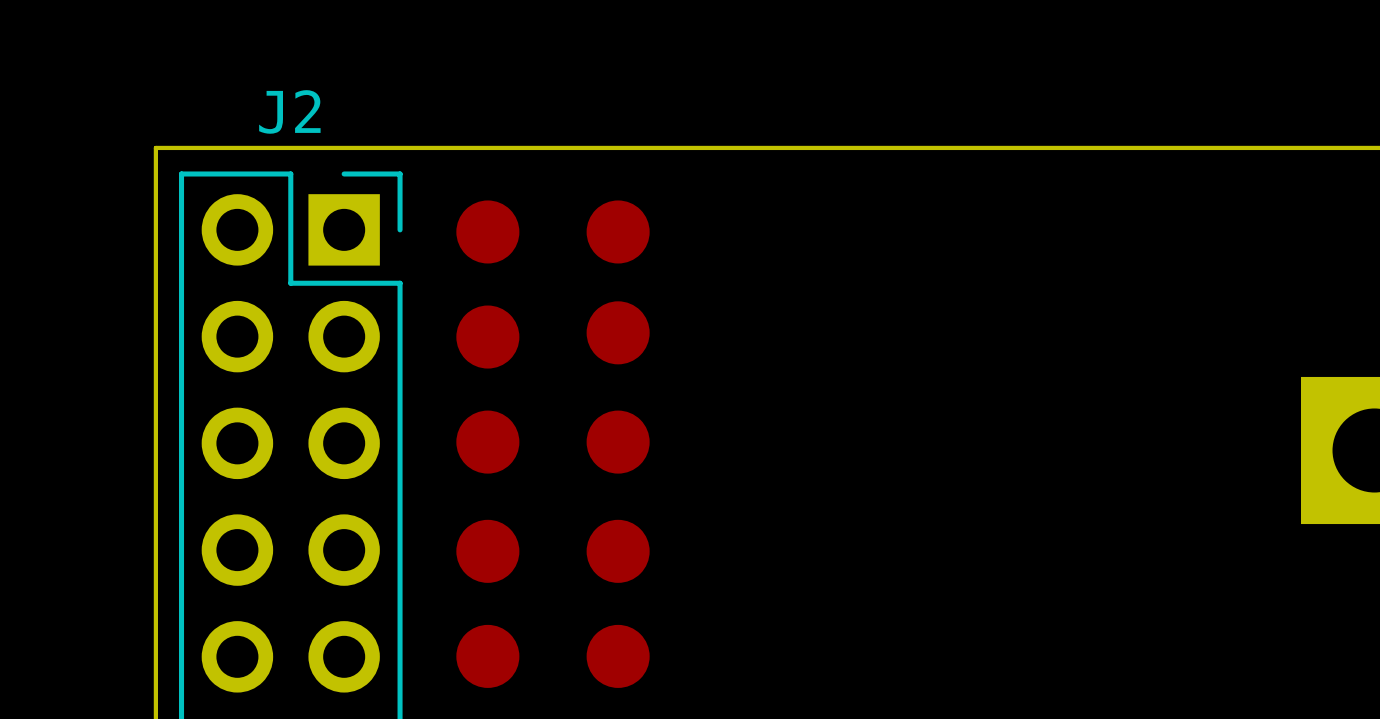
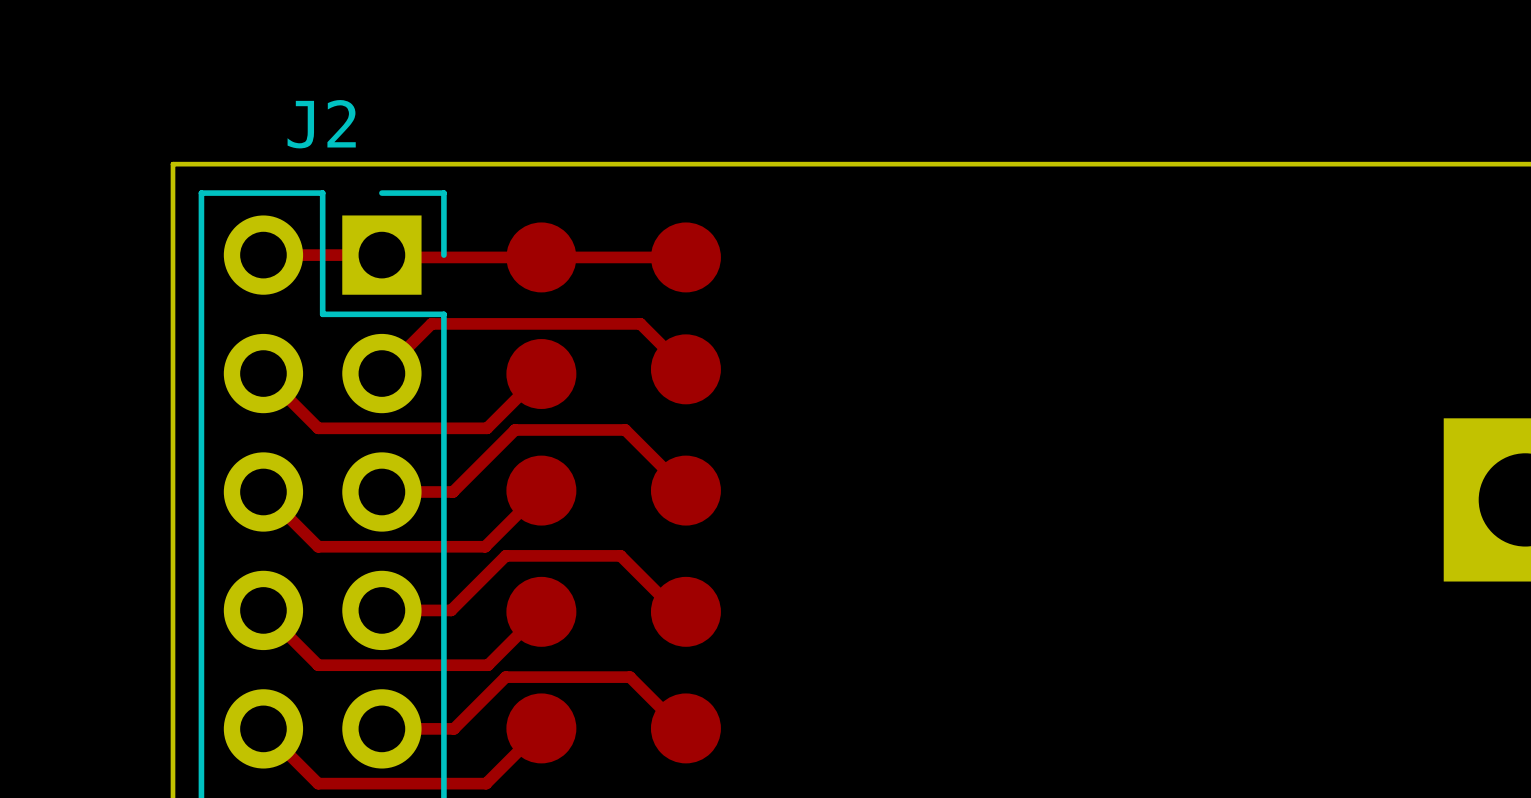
top track: none -> (263, 255) (381, 255) (384, 257) (685, 257)
top track: none -> (685, 369) (640, 323) (431, 323) (381, 373)
top track: none -> (263, 373) (318, 428) (487, 428) (541, 374)
top track: none -> (541, 490) (485, 546) (318, 546) (263, 491)
top track: none -> (685, 490) (625, 429) (515, 429) (453, 491) (381, 491)
top track: none -> (263, 610) (318, 665) (488, 665) (541, 611)
top track: none -> (381, 610) (451, 610) (505, 555) (620, 555) (676, 611) (685, 611)
top track: none -> (541, 728) (486, 783) (318, 783) (263, 728)
top track: none -> (685, 728) (681, 728) (629, 677) (505, 677) (453, 728) (381, 728)

